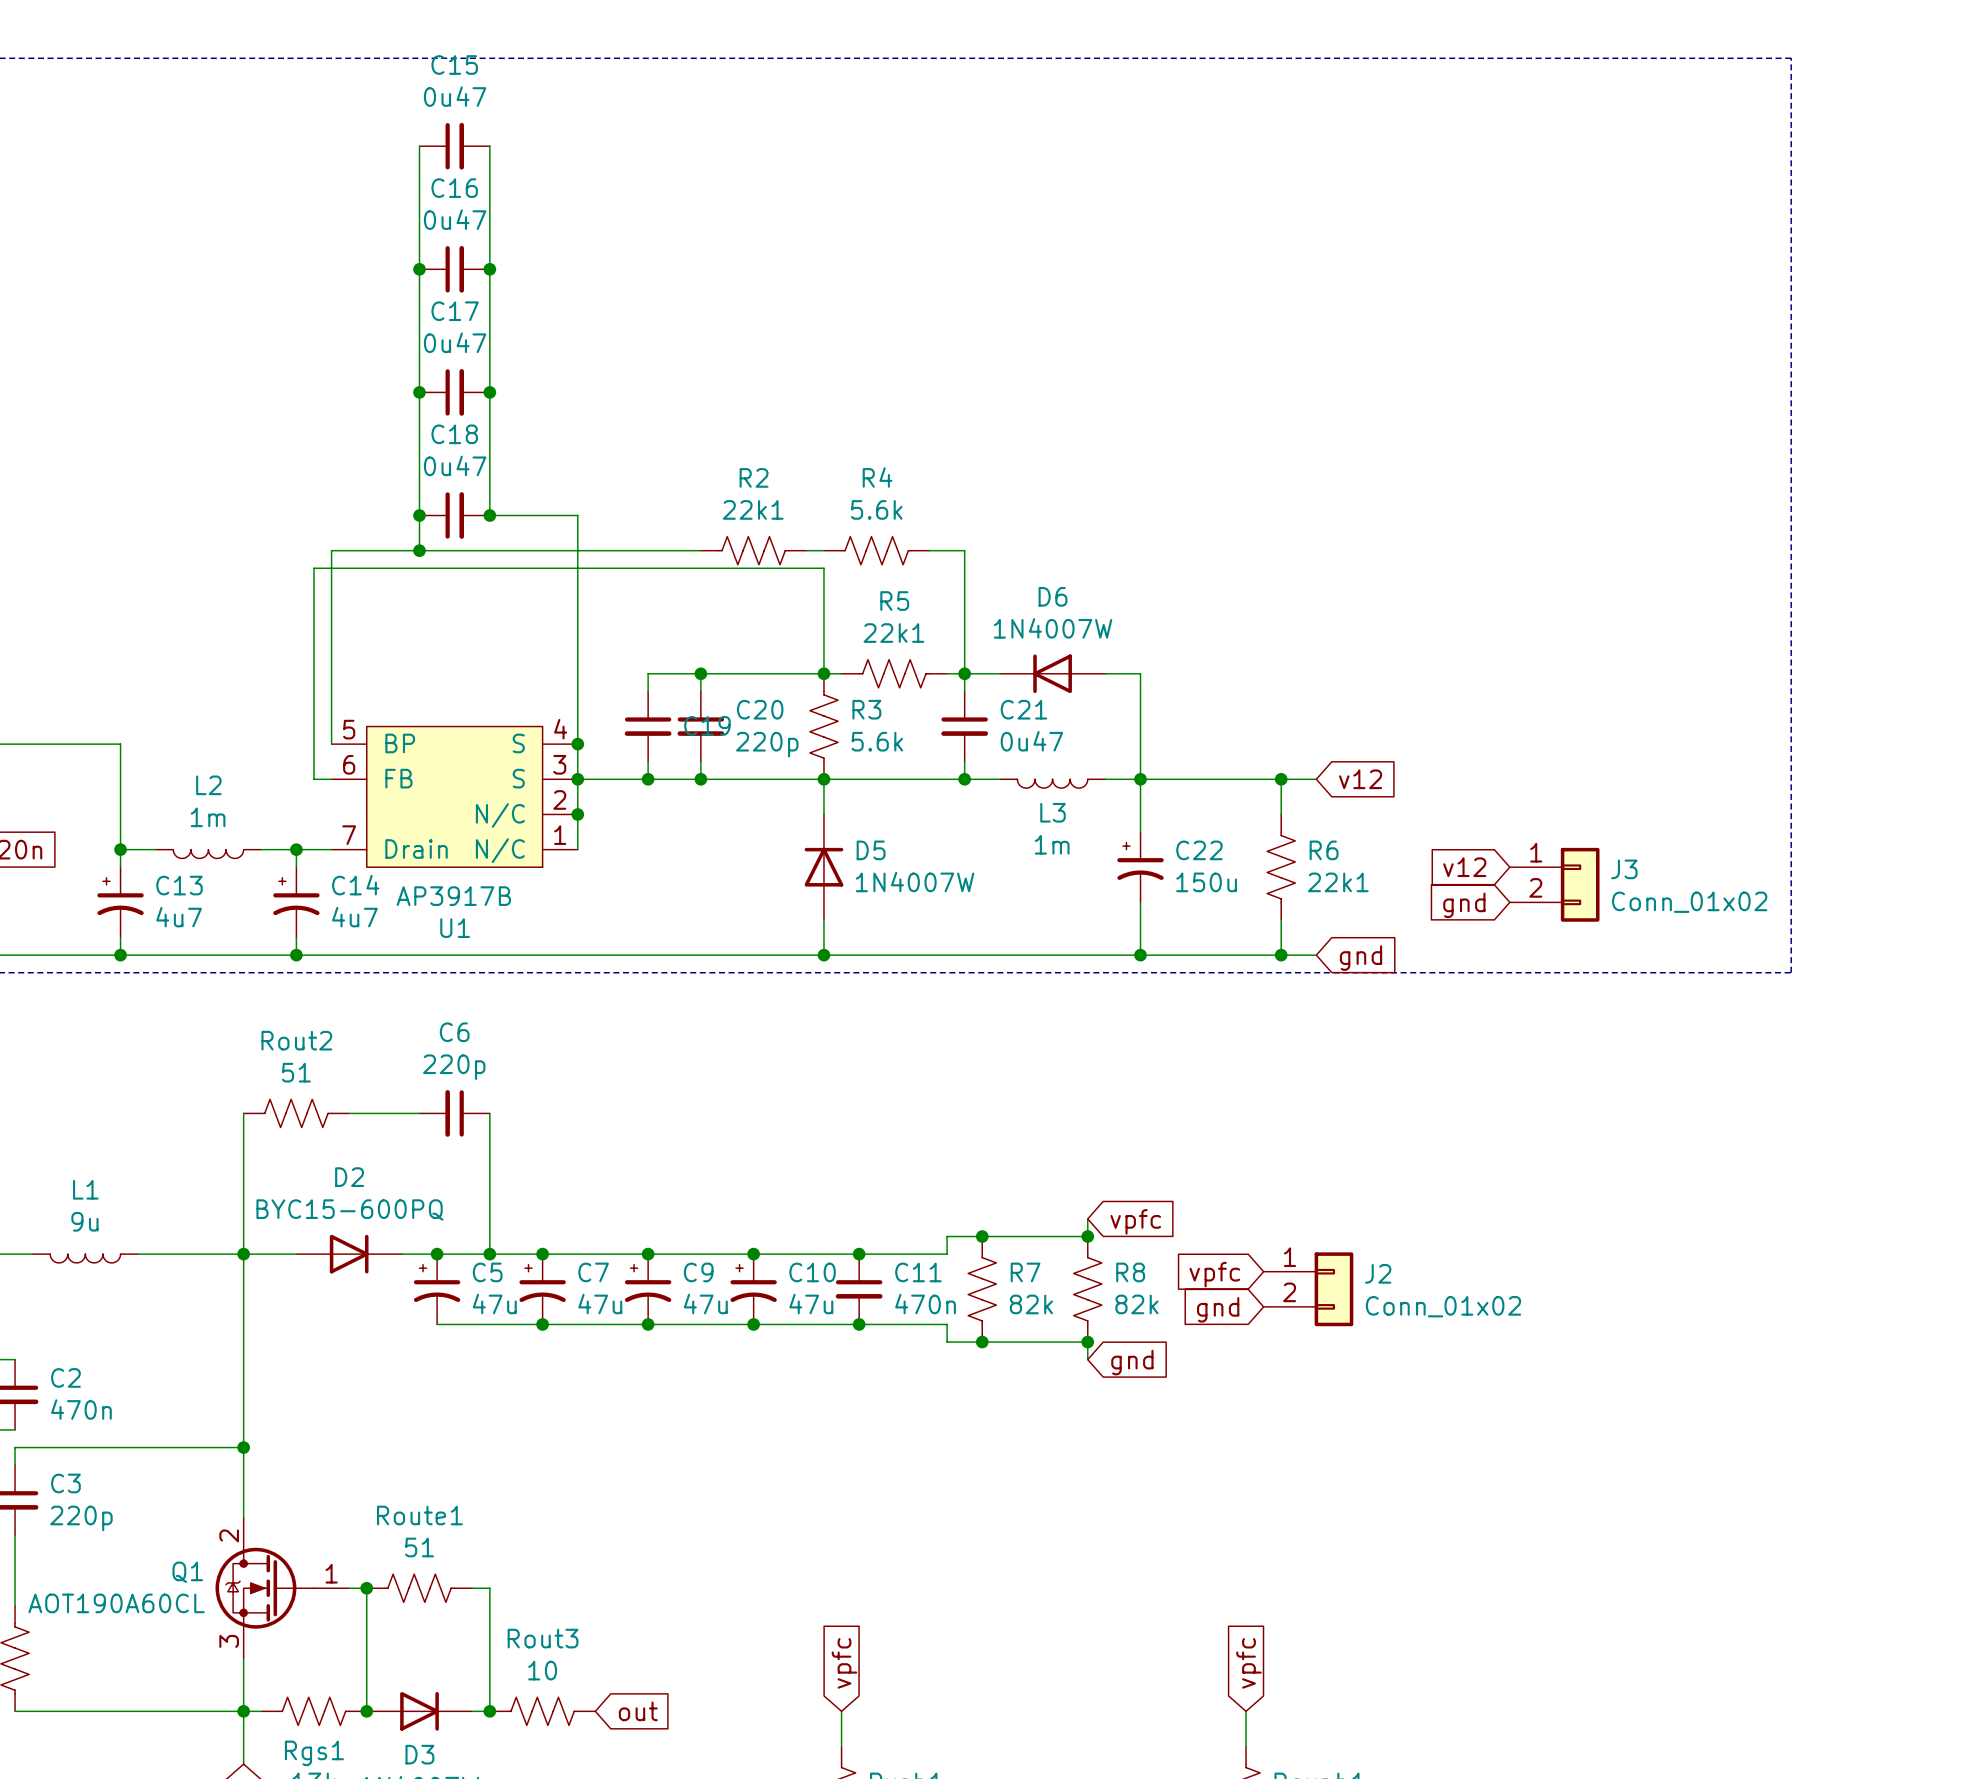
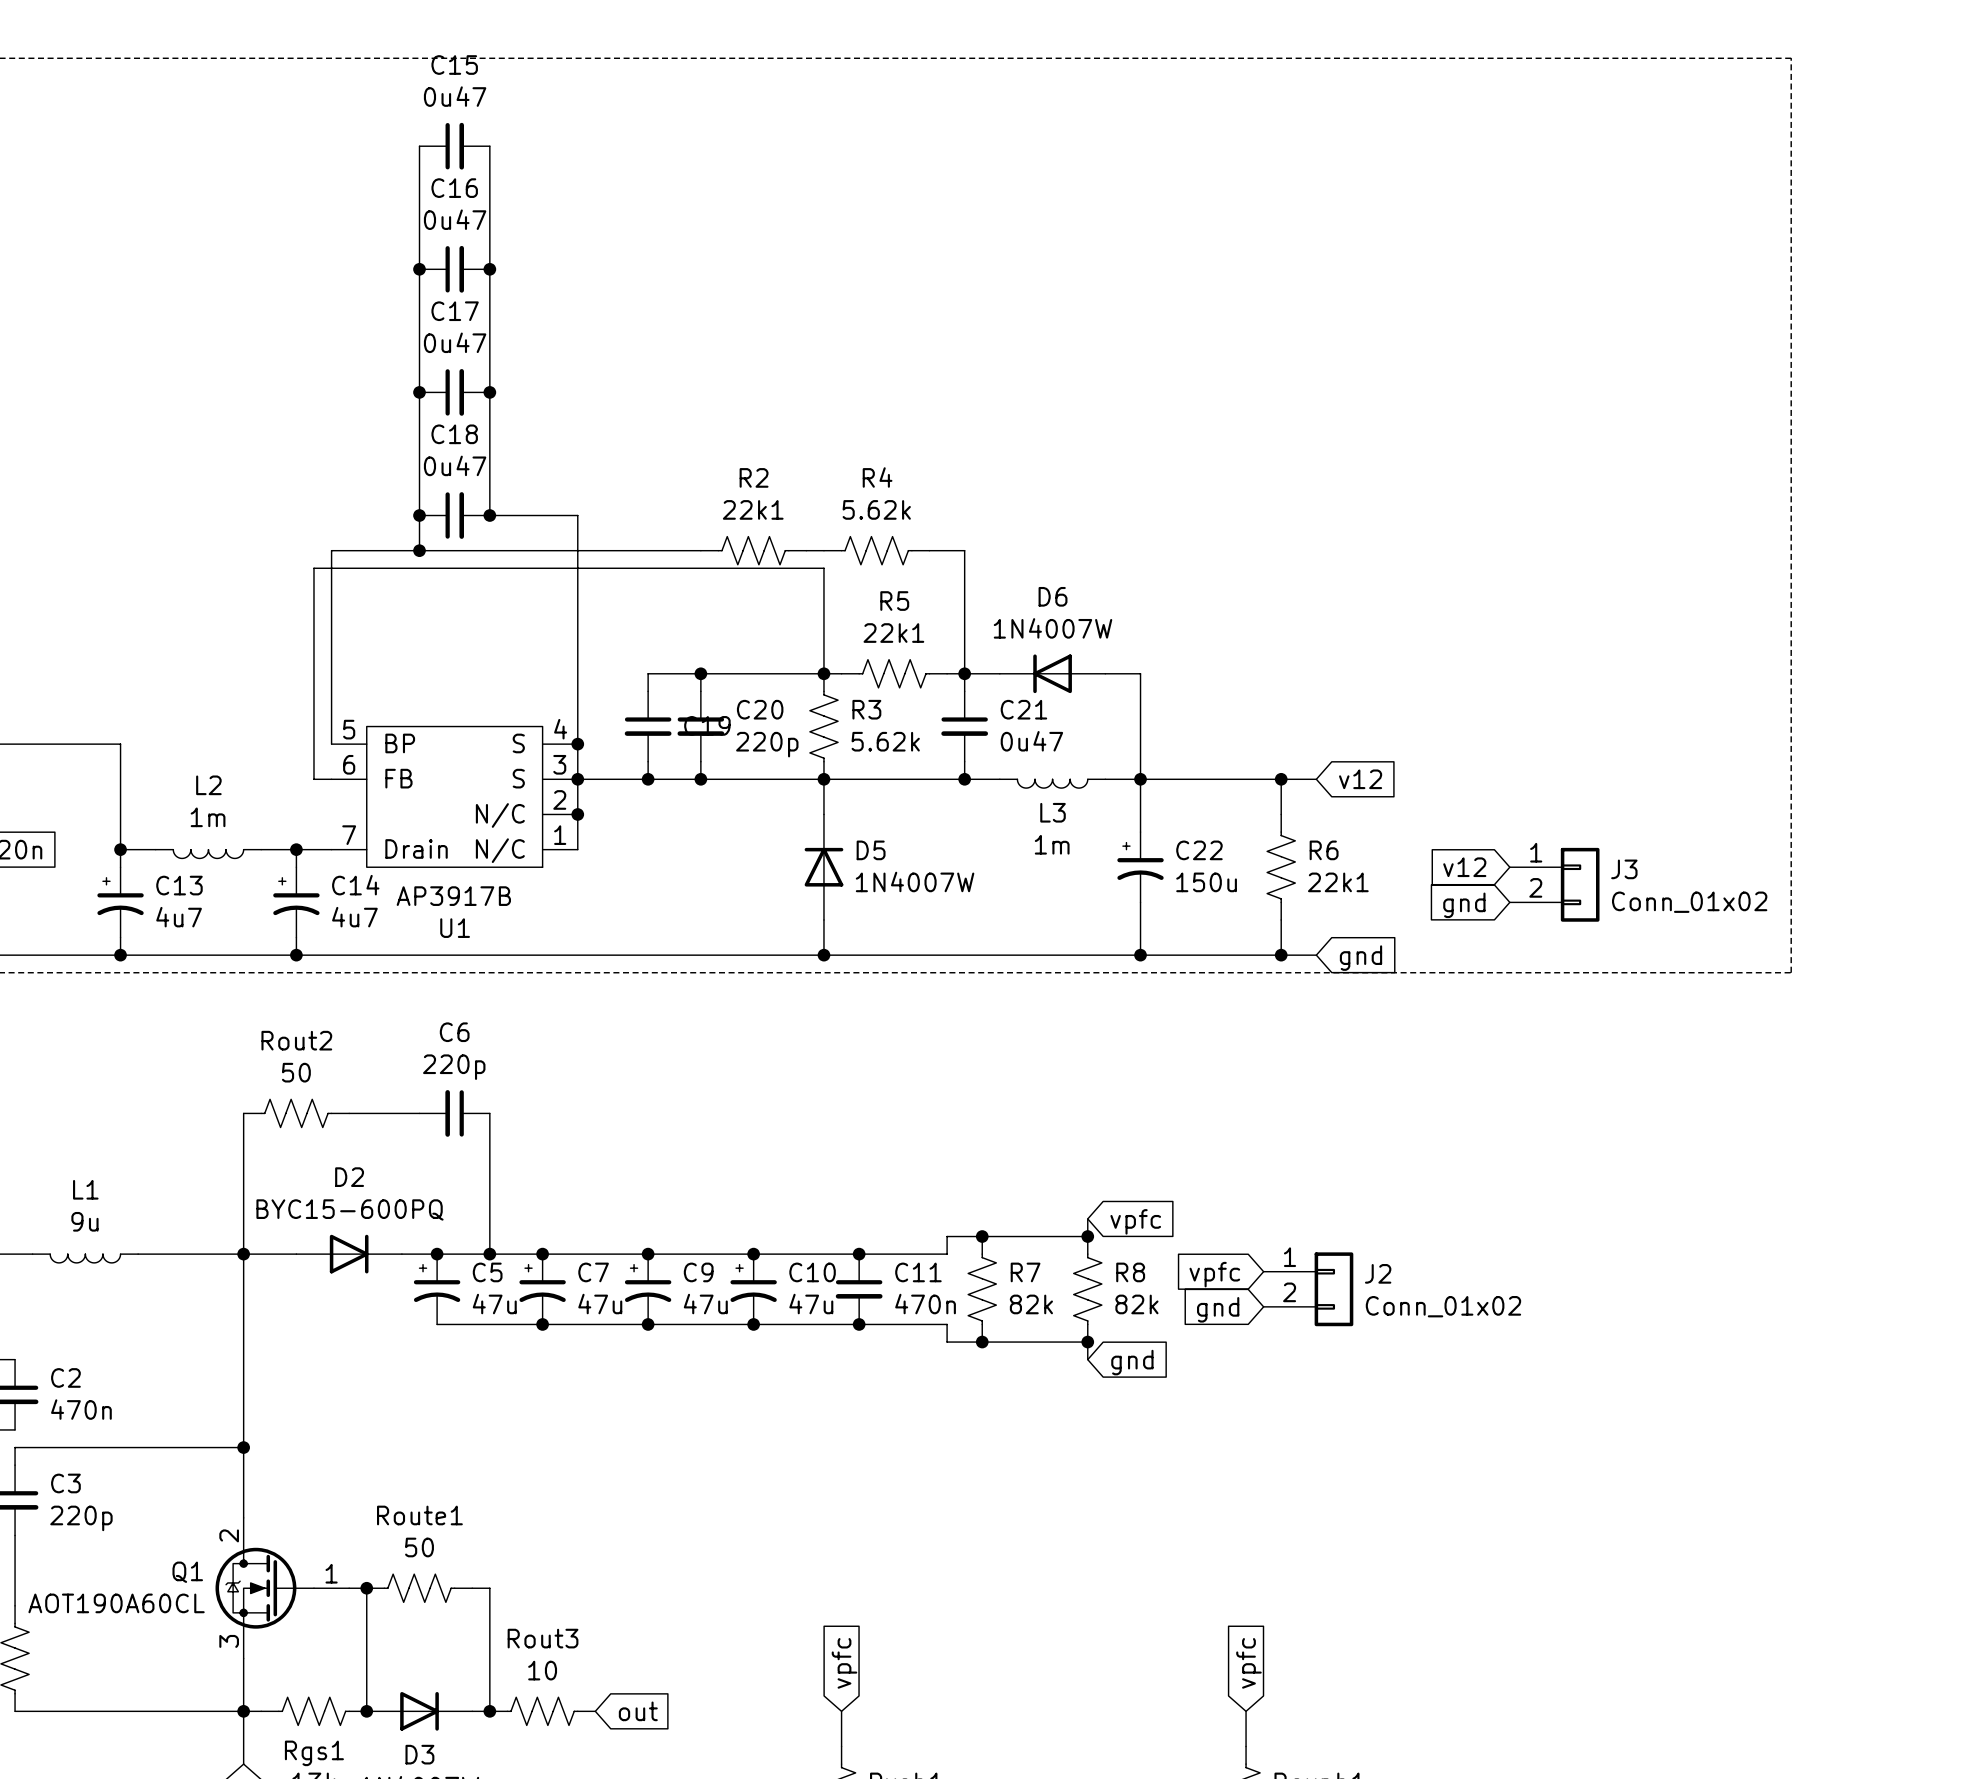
R4 value: 5.6k (876, 509) -> 5.62k (876, 509)
R3 value: 5.6k (877, 741) -> 5.62k (885, 741)
Rout2 value: 51 (296, 1072) -> 50 (296, 1072)
Route1 value: 51 (419, 1547) -> 50 (419, 1547)

